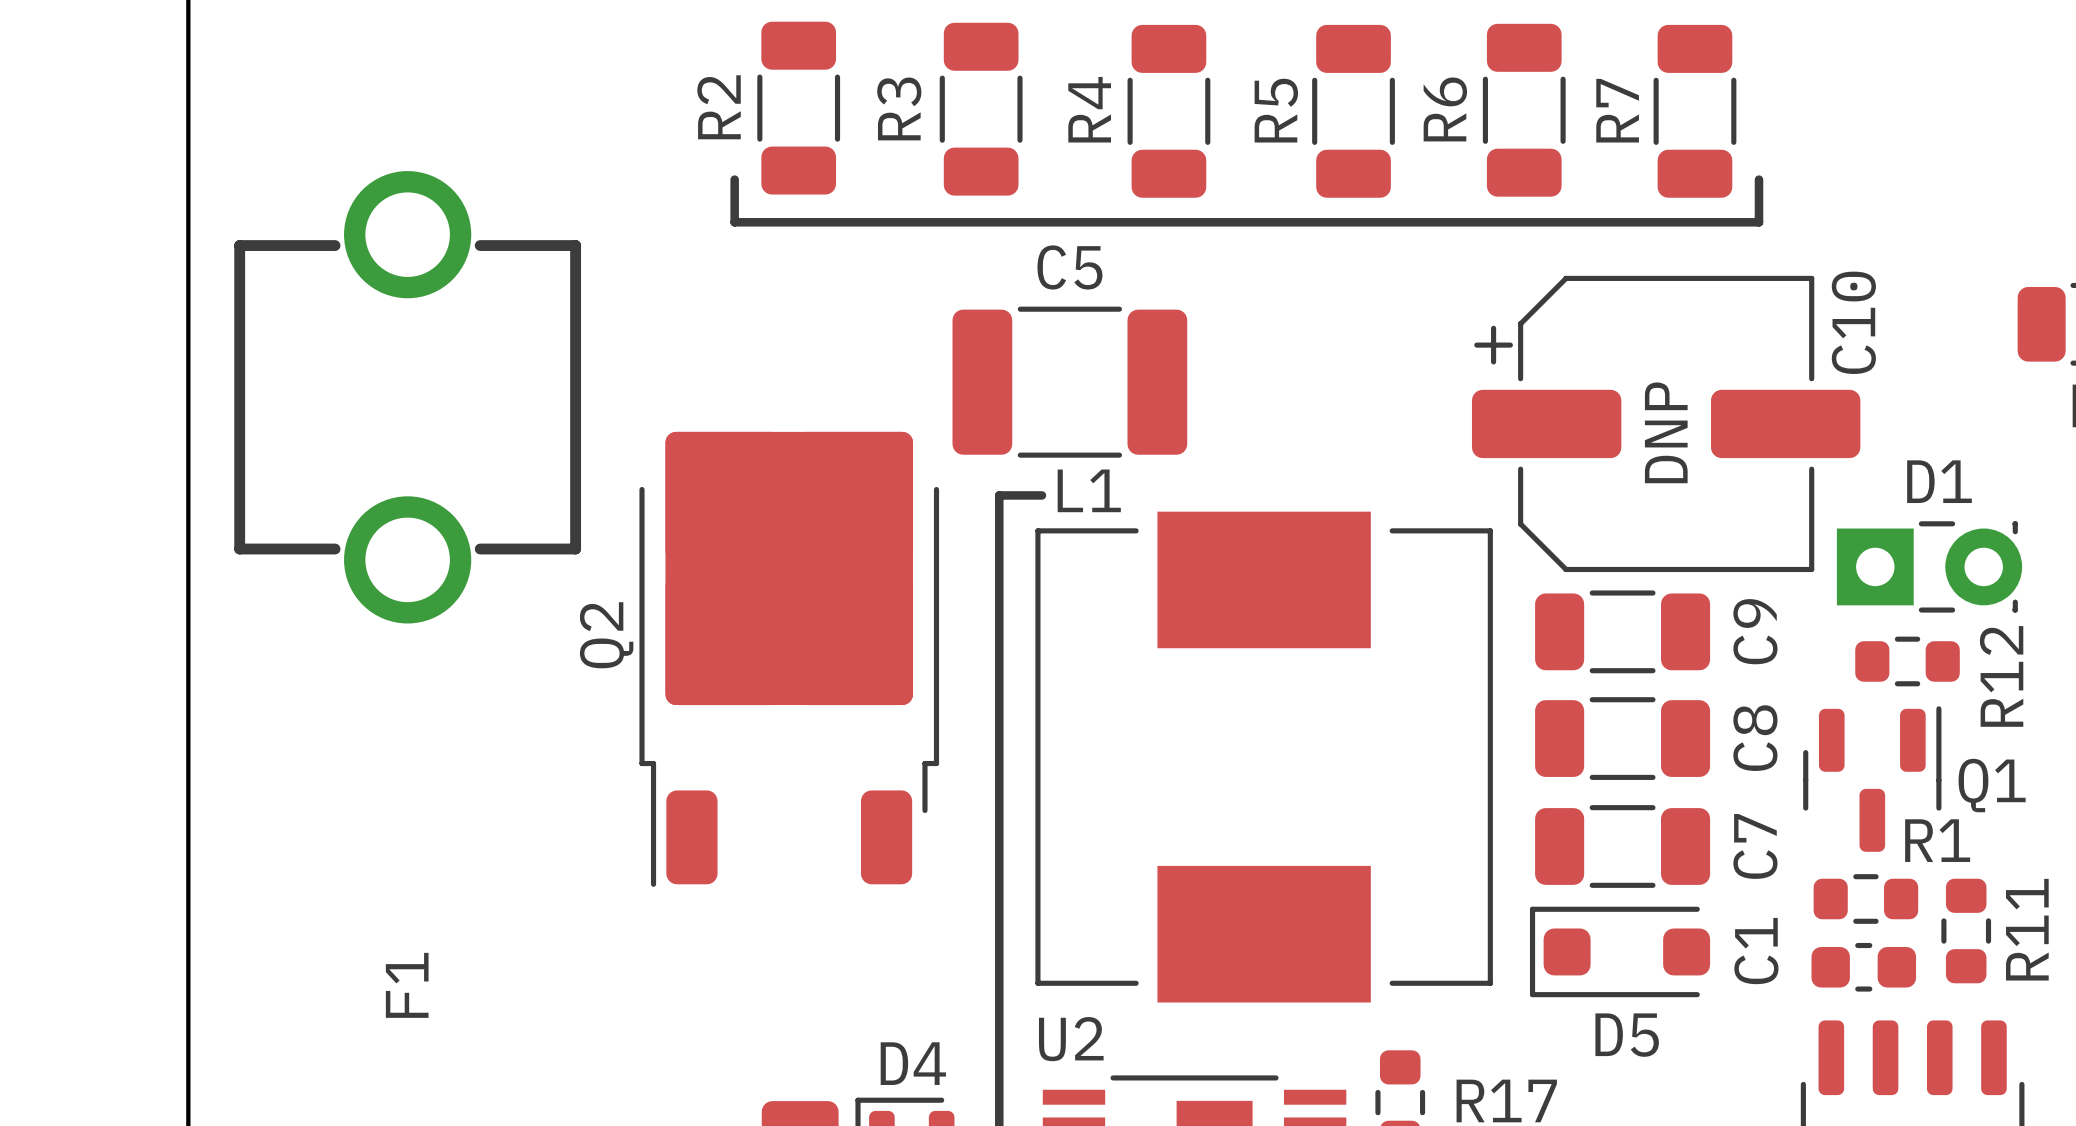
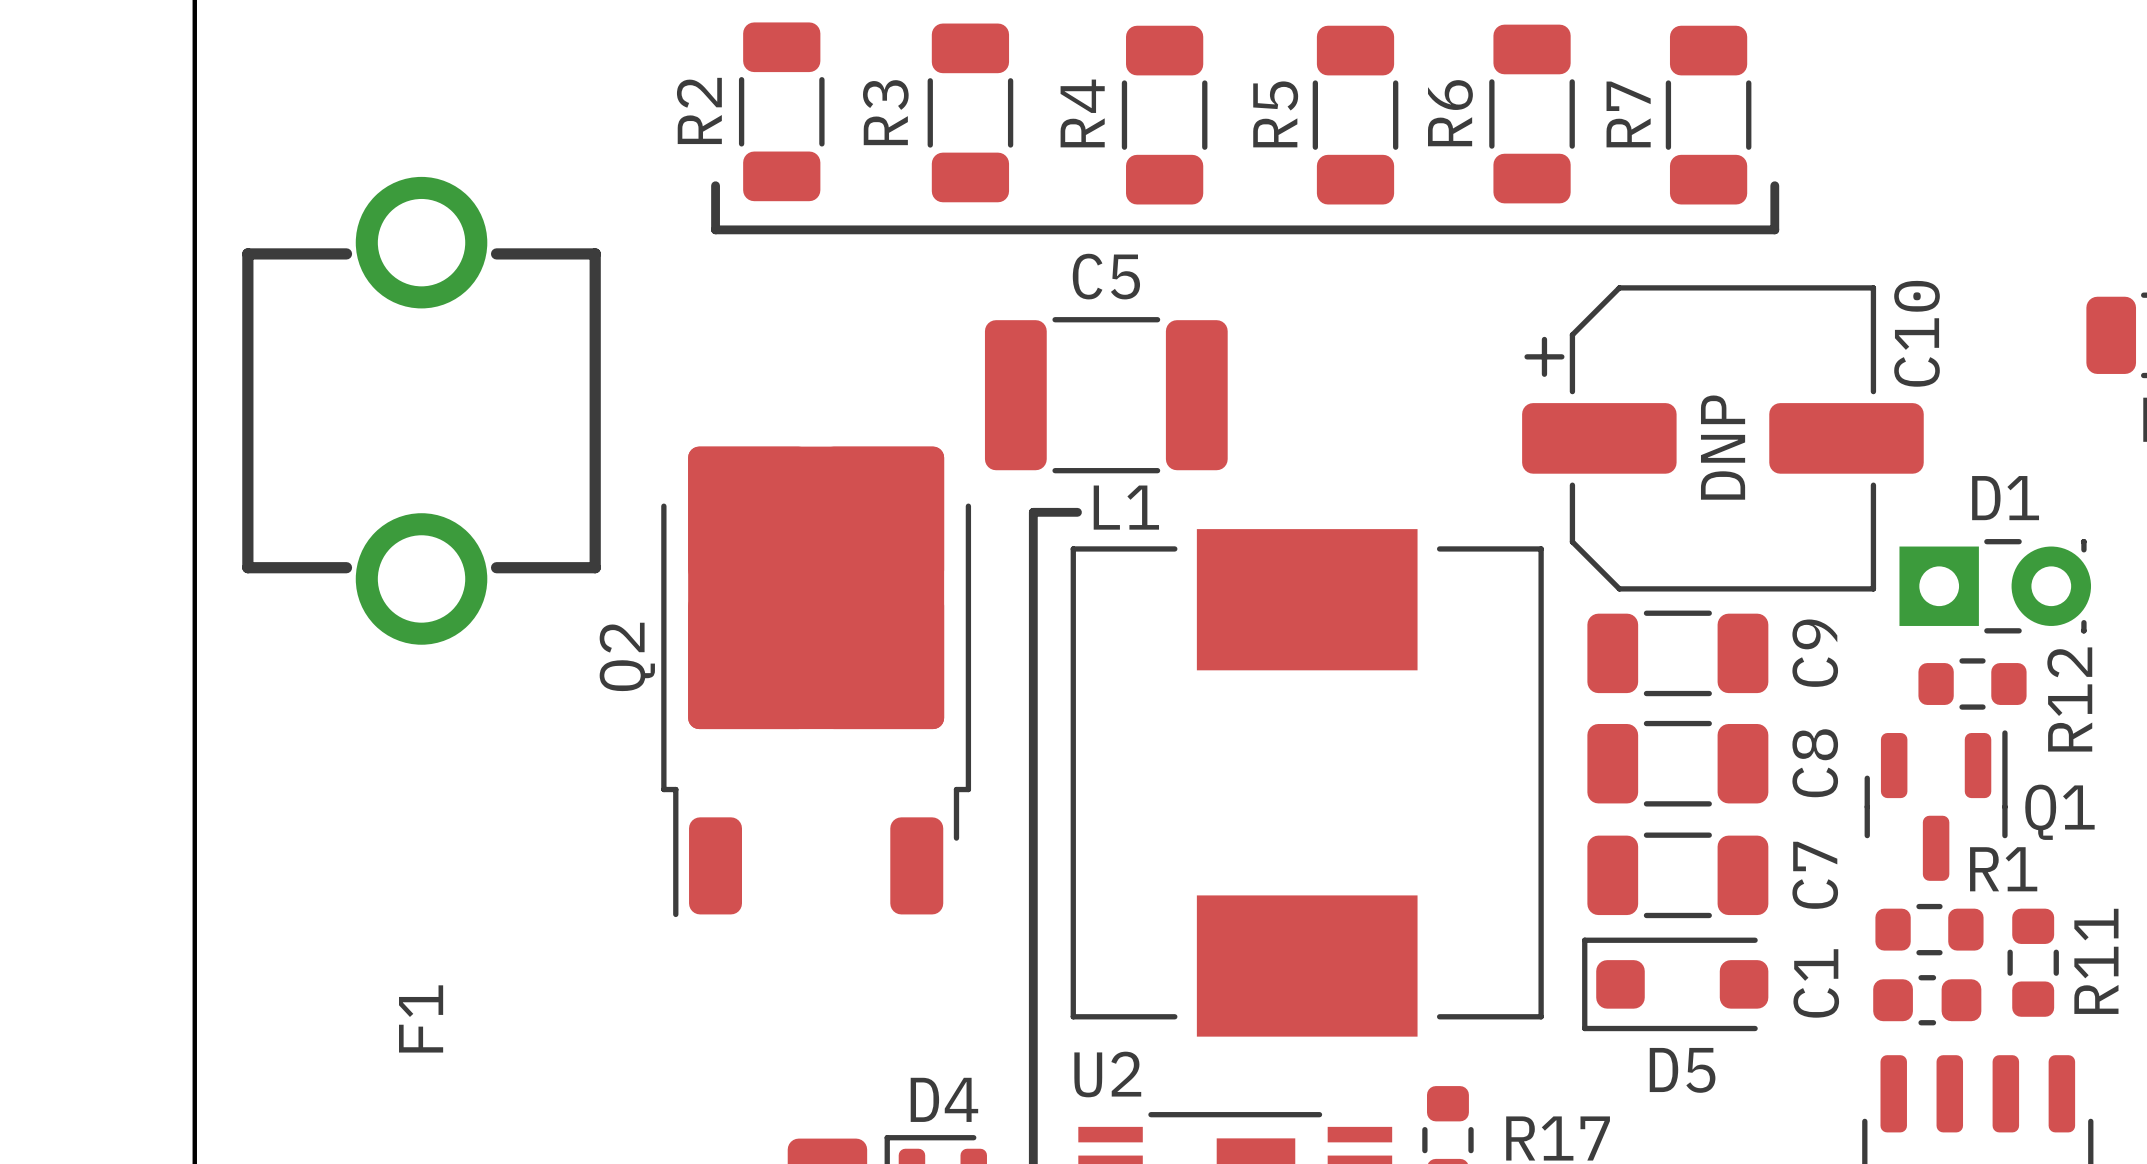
R2 position: (798, 108) -> (781, 111)
R3 position: (981, 109) -> (970, 112)
R6 position: (1524, 110) -> (1532, 114)
R4 position: (1168, 111) -> (1164, 115)
R5 position: (1353, 111) -> (1355, 115)
R7 position: (1694, 111) -> (1708, 115)
line: (734, 179) (734, 222) -> (715, 185) (715, 229) (759, 229)
line: (1758, 179) (1758, 222) (1716, 222) -> (1774, 185) (1774, 229)

